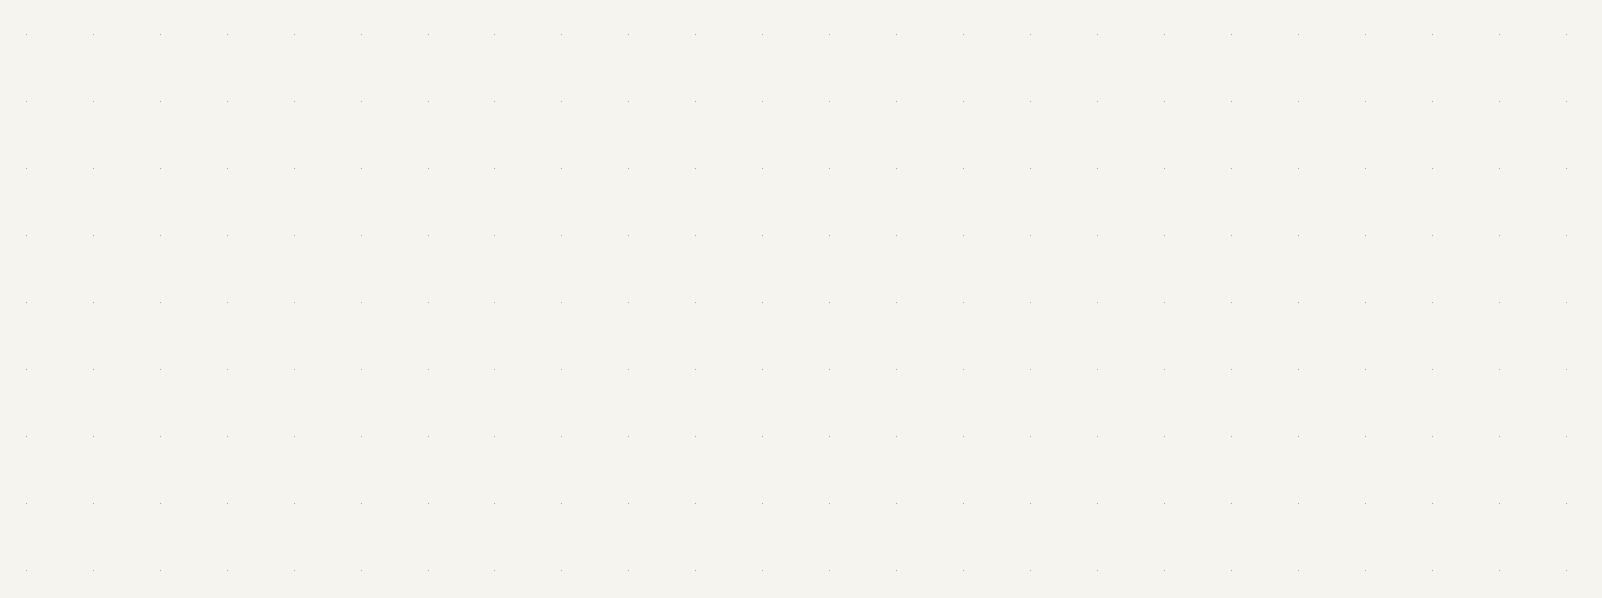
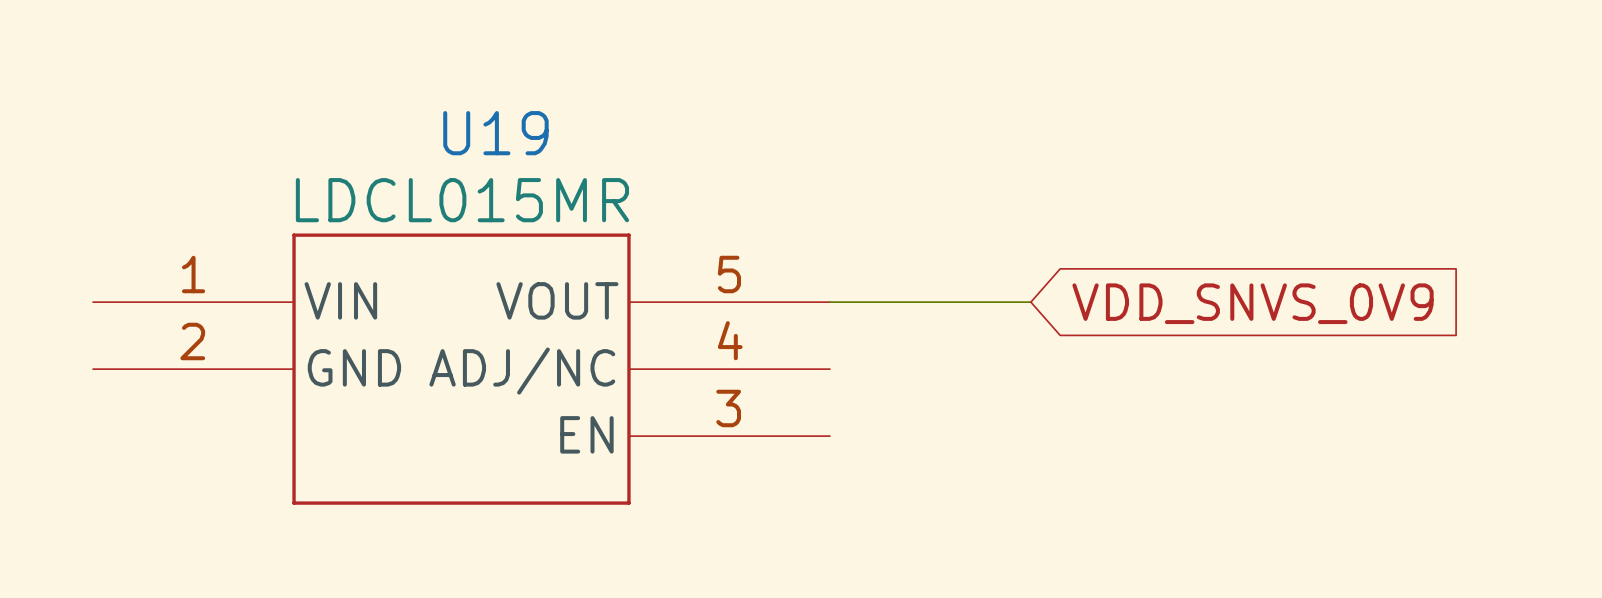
wire: none -> (829, 302) (1030, 302)
global label: none -> VDD_SNVS_0V9 (1253, 303)
U19: none -> LDCL015MR (461, 369)

